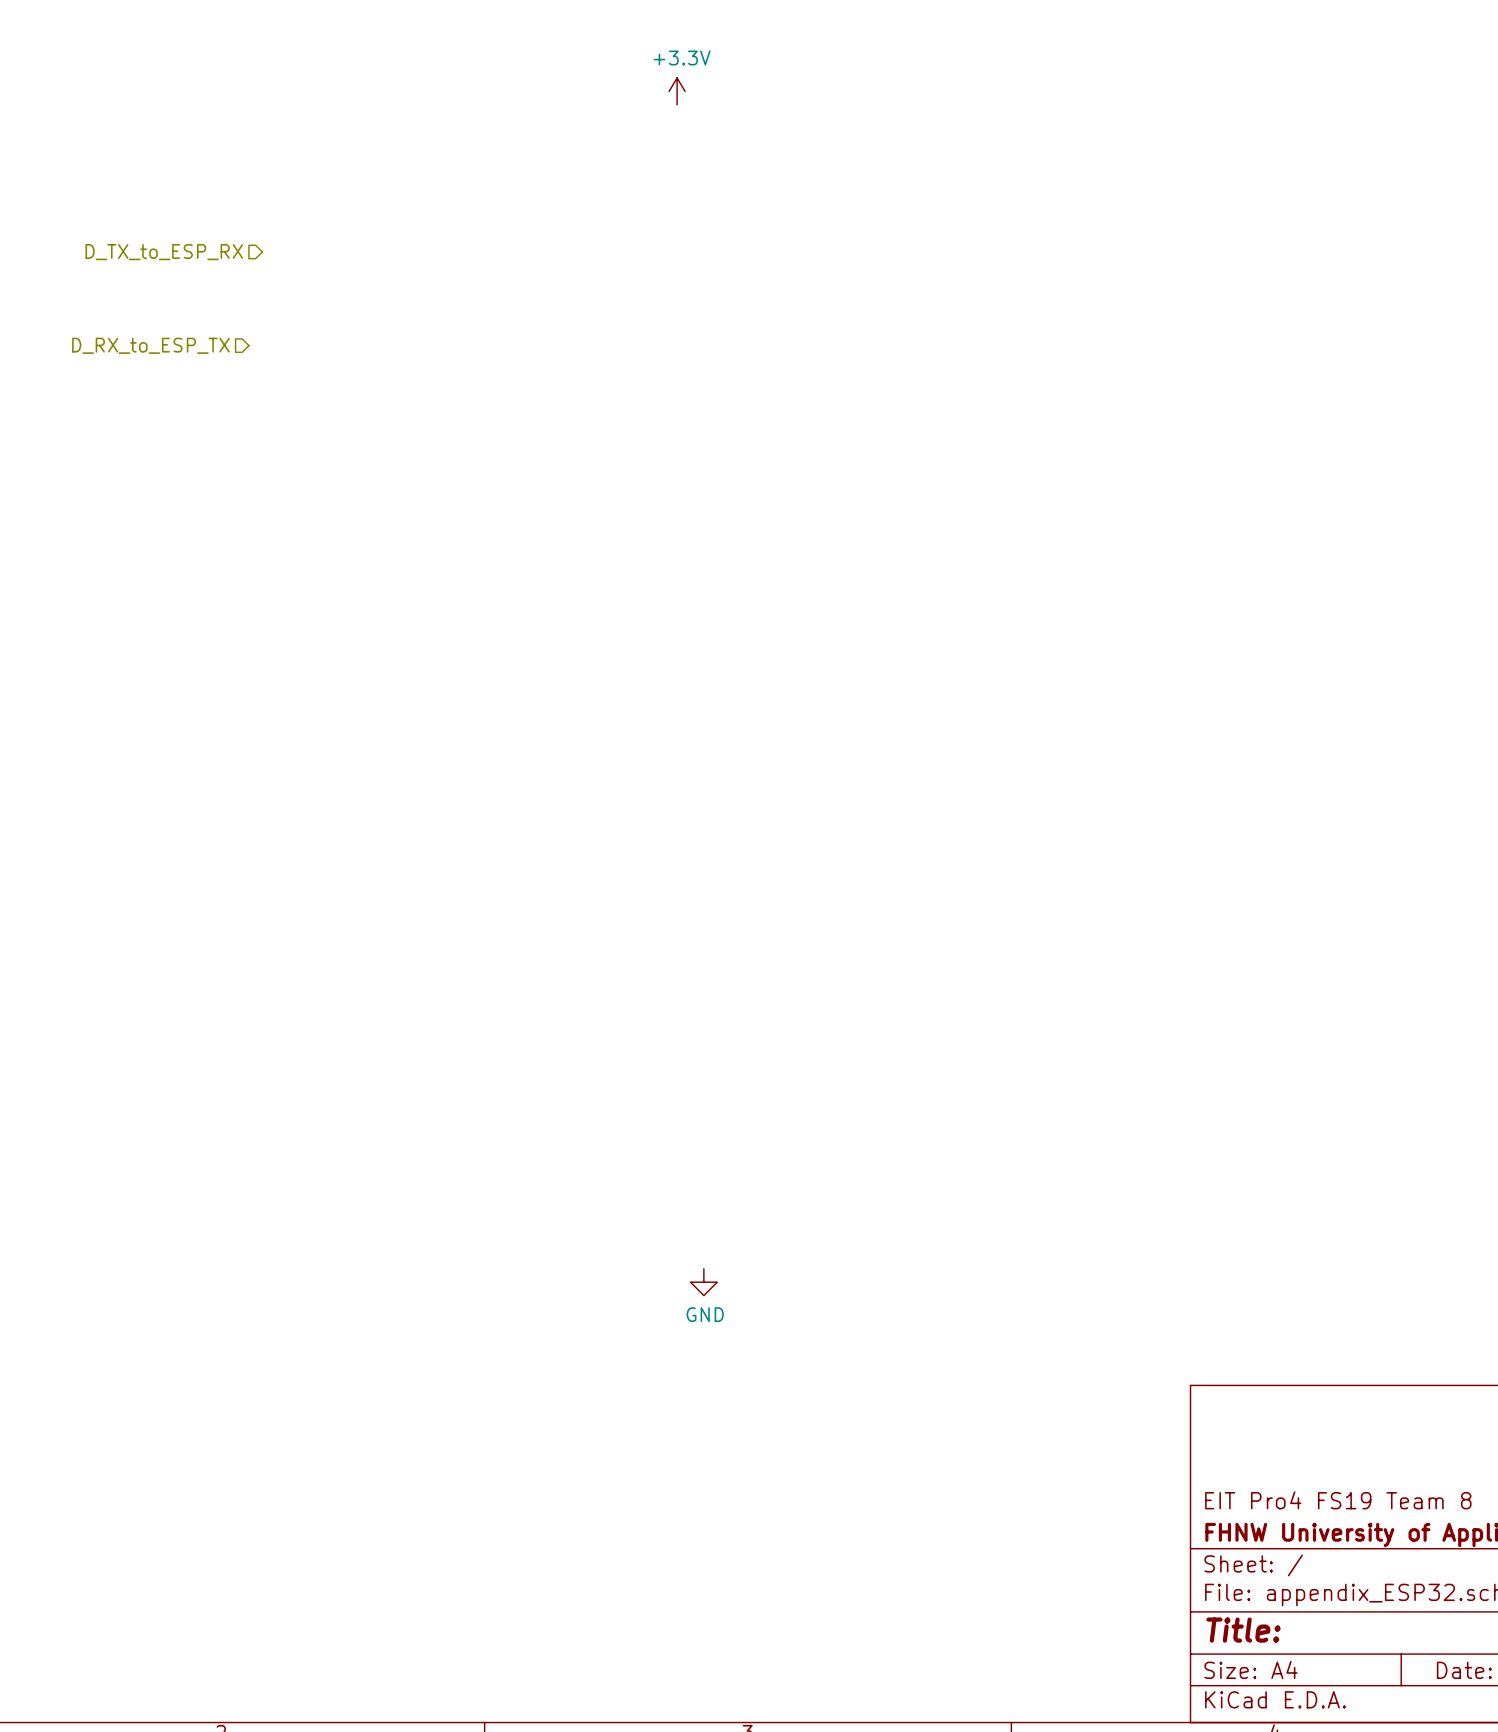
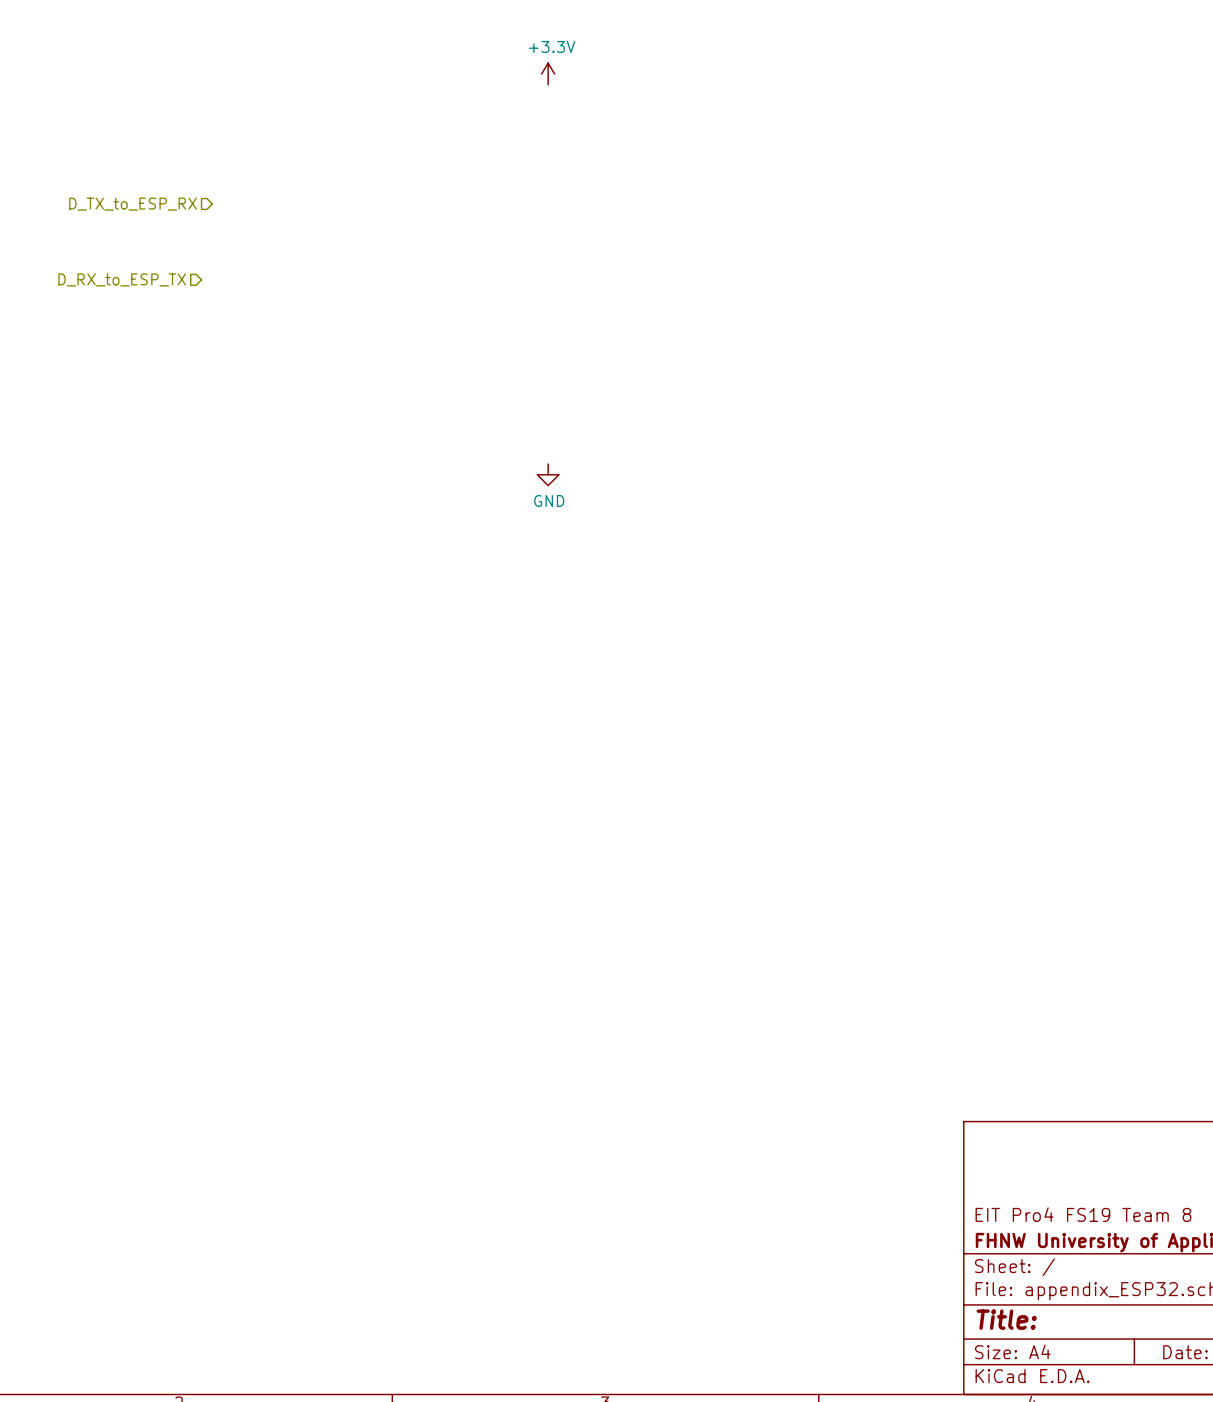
power symbol: none -> GND (548, 474)
power symbol: GND (703, 1282) -> none

